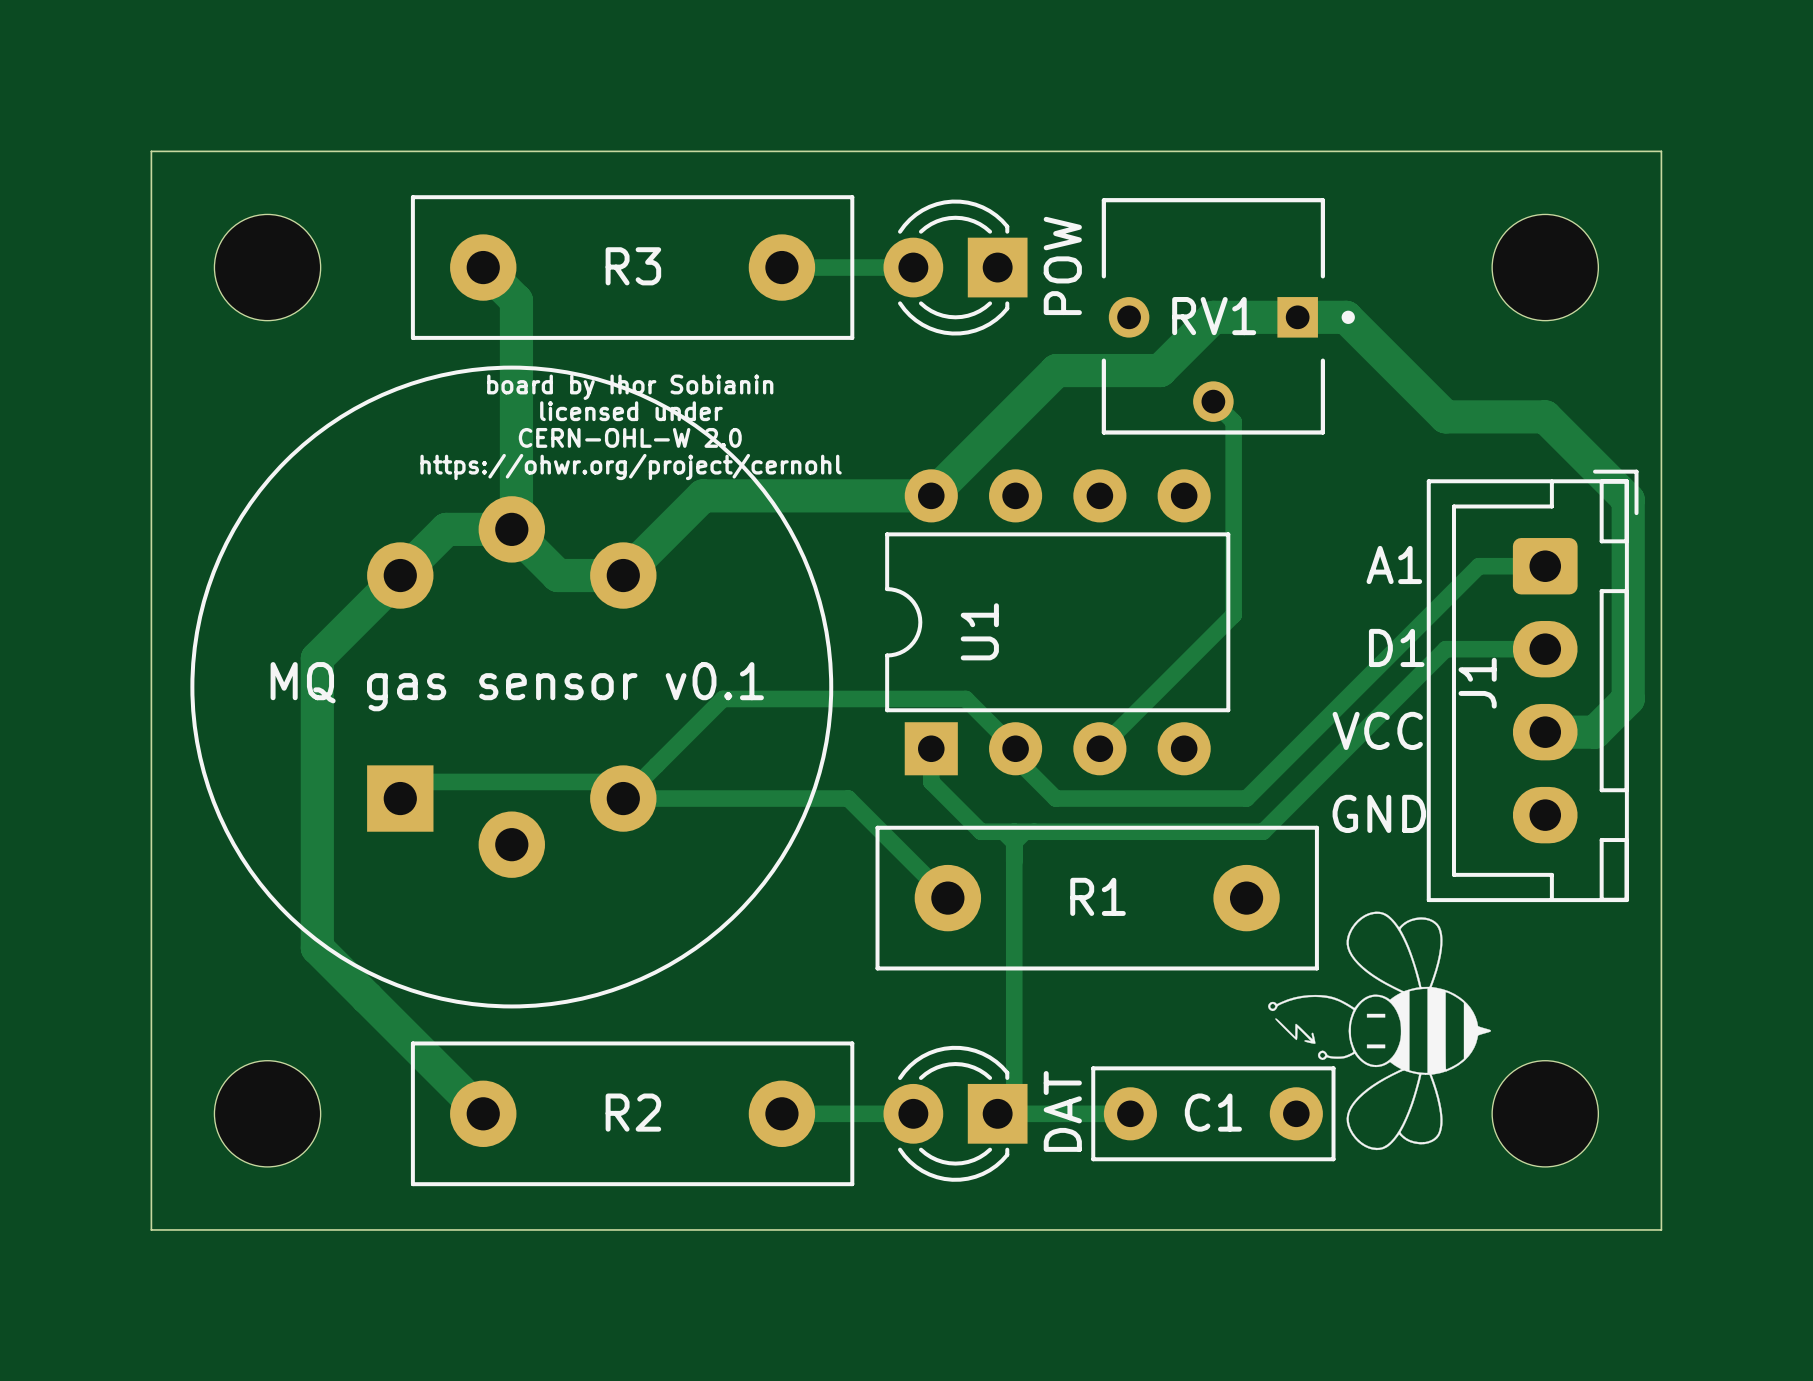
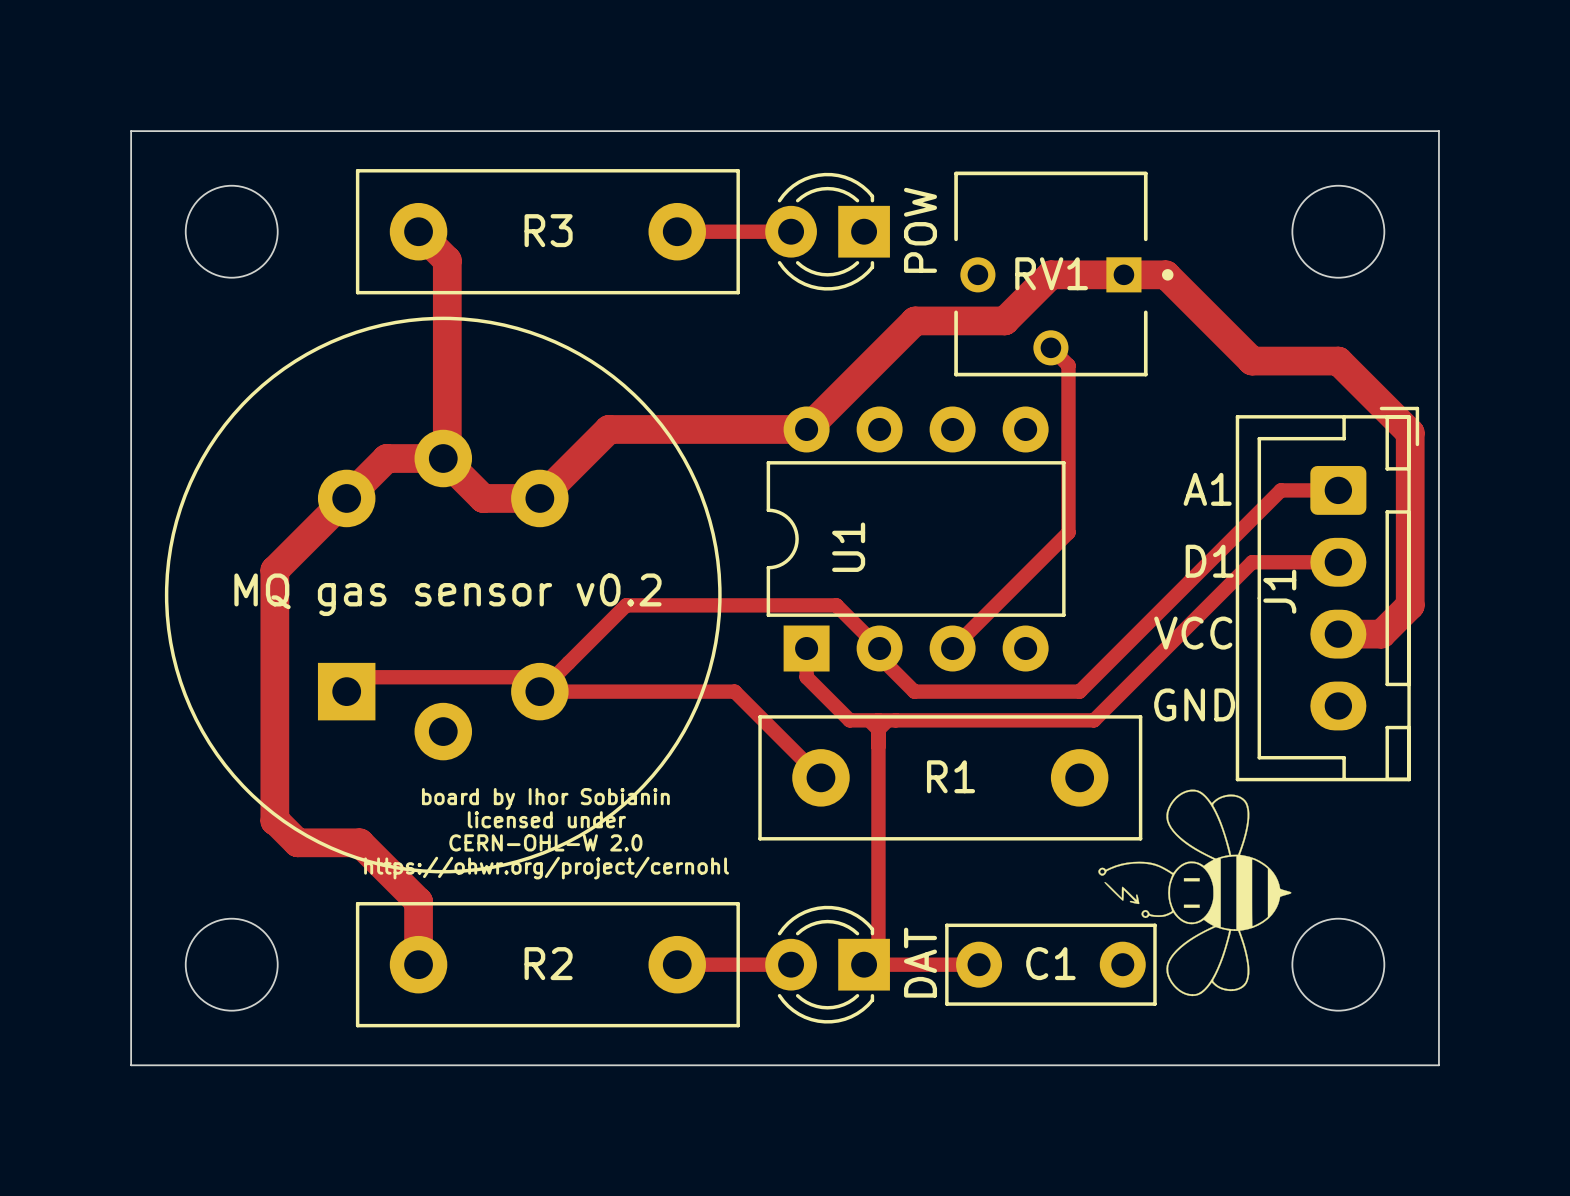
text position: board by Ihor Sobianin (630, 387) -> board by Ihor Sobianin (545, 799)
text position: licensed under (631, 411) -> licensed under (546, 819)
text position: CERN-OHL-W 2.0 (630, 437) -> CERN-OHL-W 2.0 (545, 842)
text position: https://ohwr.org/project/cernohl (631, 467) -> https://ohwr.org/project/cernohl (546, 868)
text: MQ gas sensor v0.1 (517, 686) -> MQ gas sensor v0.2 (447, 594)
track: (317, 947) (483, 1113) -> (274, 820) (297, 842) (359, 842) (418, 901) (418, 964)

